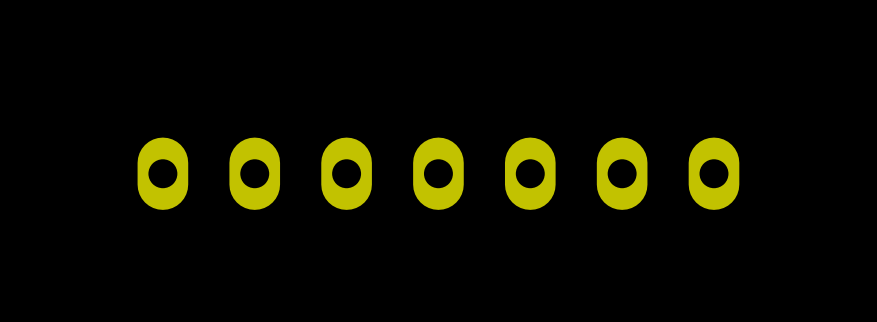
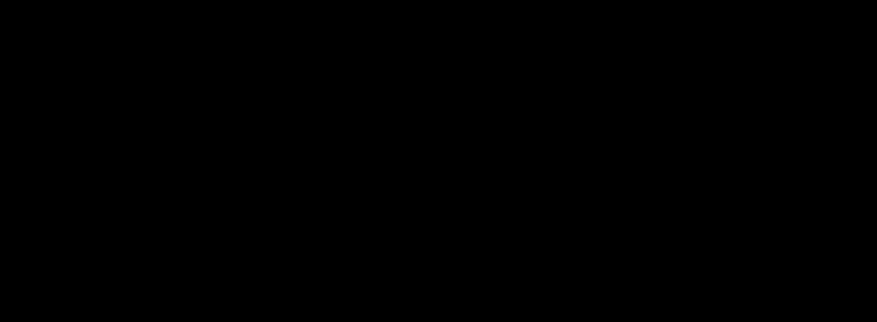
part: (438, 173) -> none

